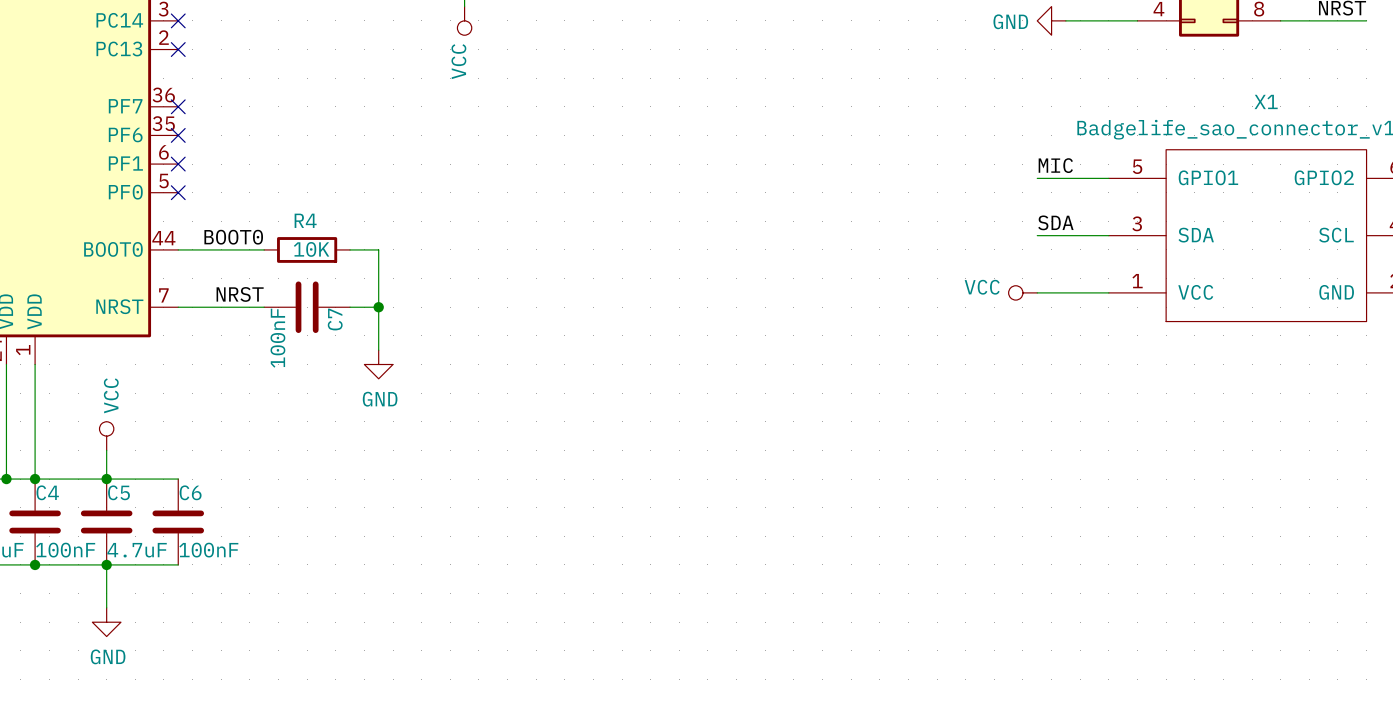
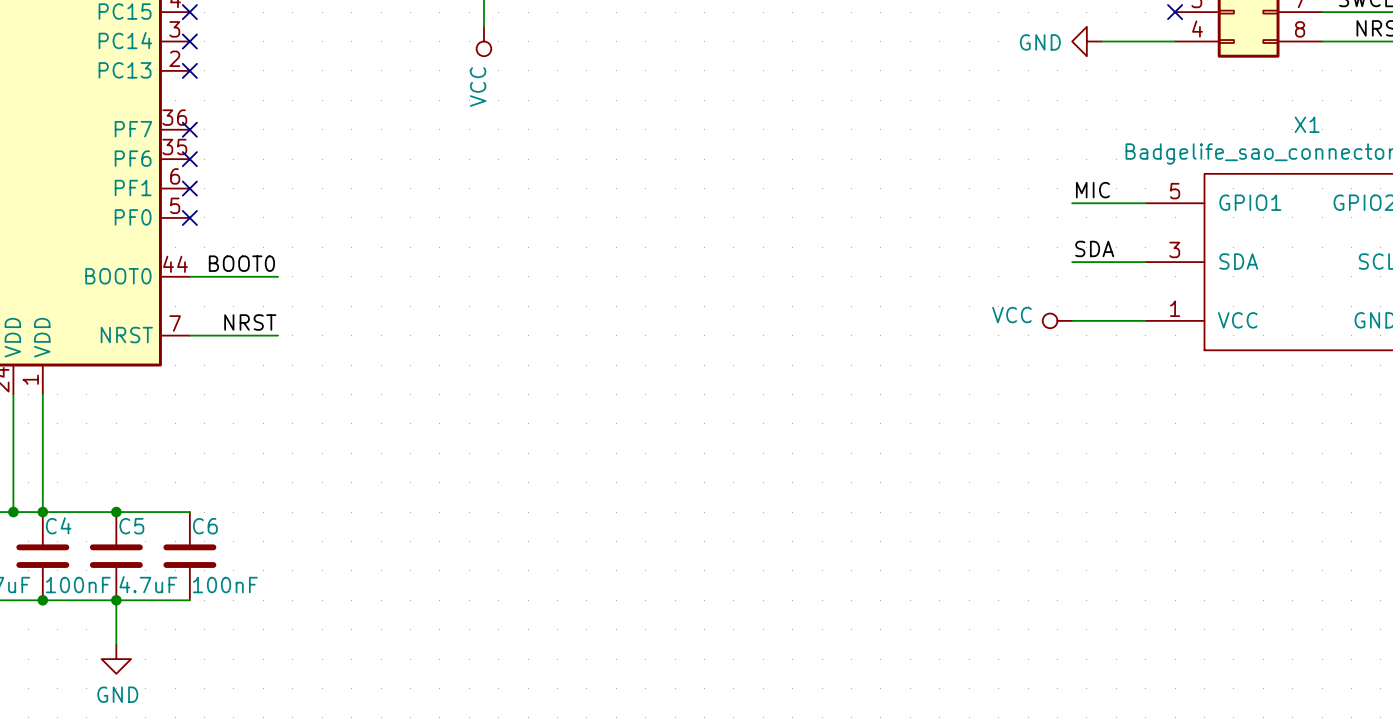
R4: 10K (307, 249) -> none
wire: (350, 249) (378, 249) (378, 350) -> none
C7: 100nF (307, 307) -> none
wire: (350, 307) (378, 307) -> none
junction: (378, 307) -> none
power symbol: GND (378, 364) -> none
power symbol: VCC (106, 436) -> none
wire: (106, 450) (106, 479) -> none

